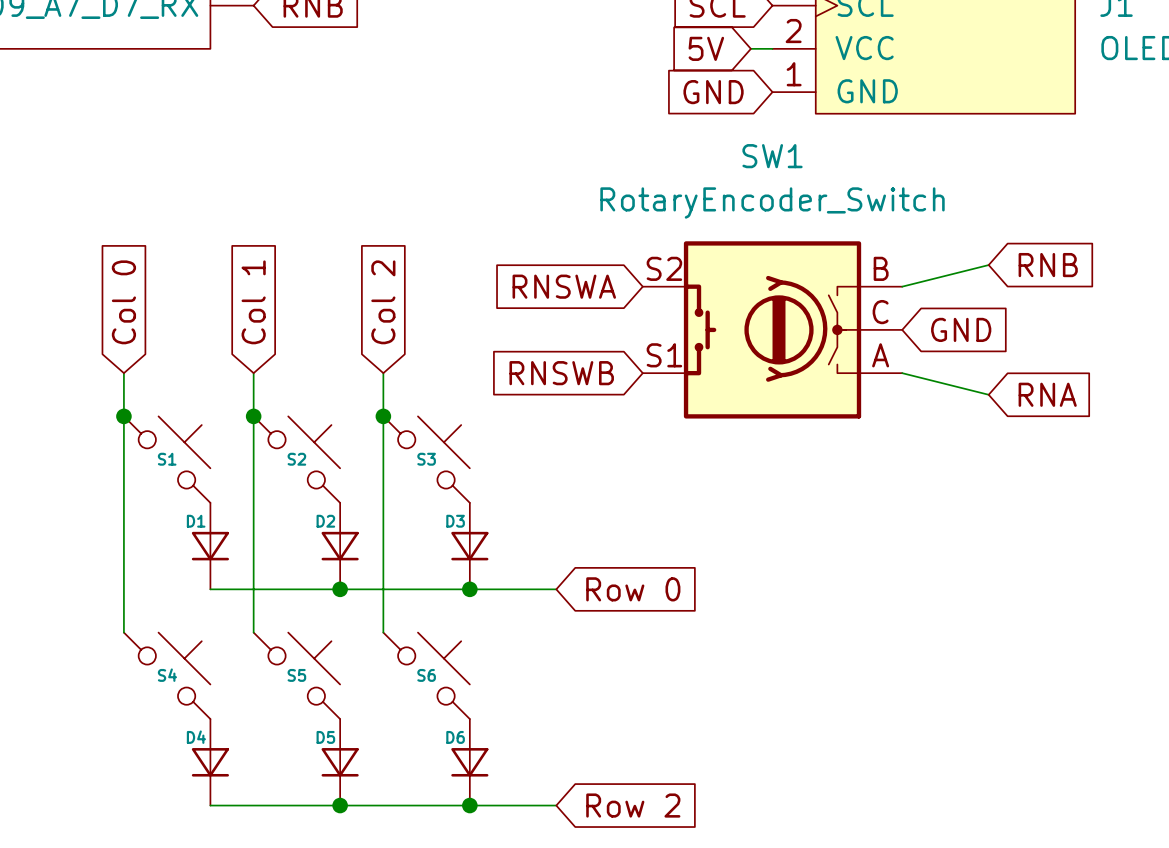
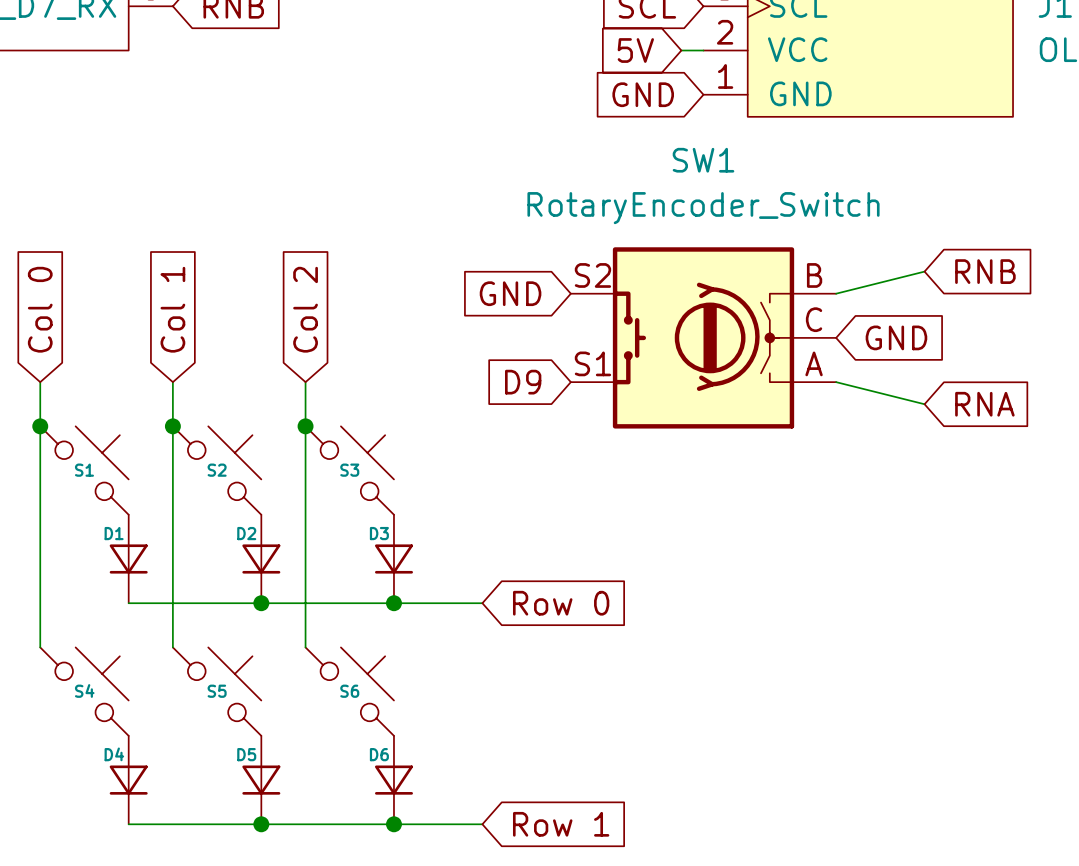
global label: RNSWA (564, 286) -> GND (510, 293)
global label: RNSWB (561, 373) -> D9 (523, 382)
global label: Row 2 (633, 805) -> Row 1 (561, 824)

